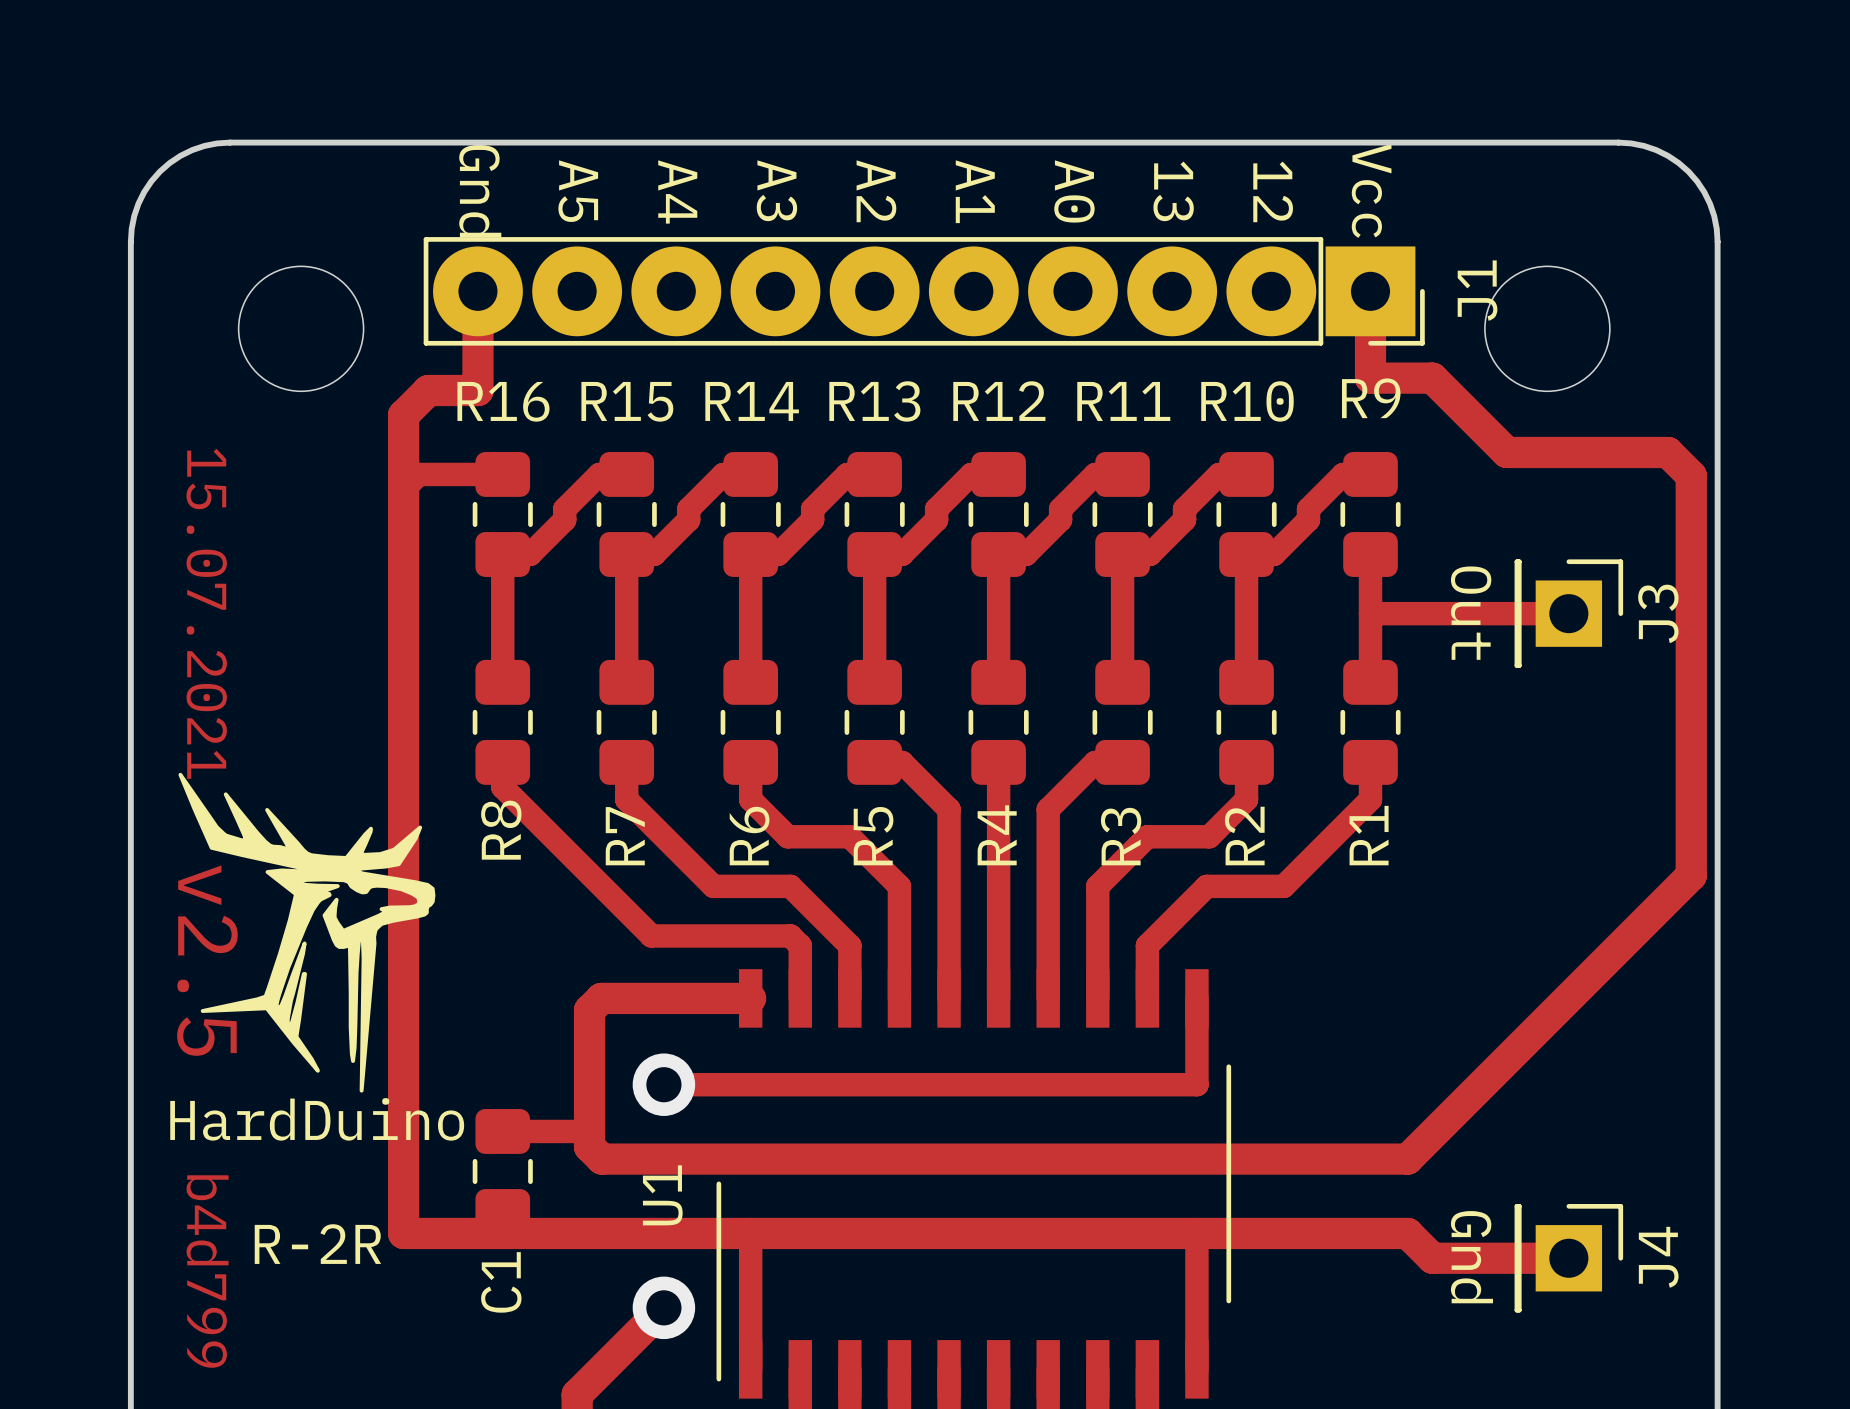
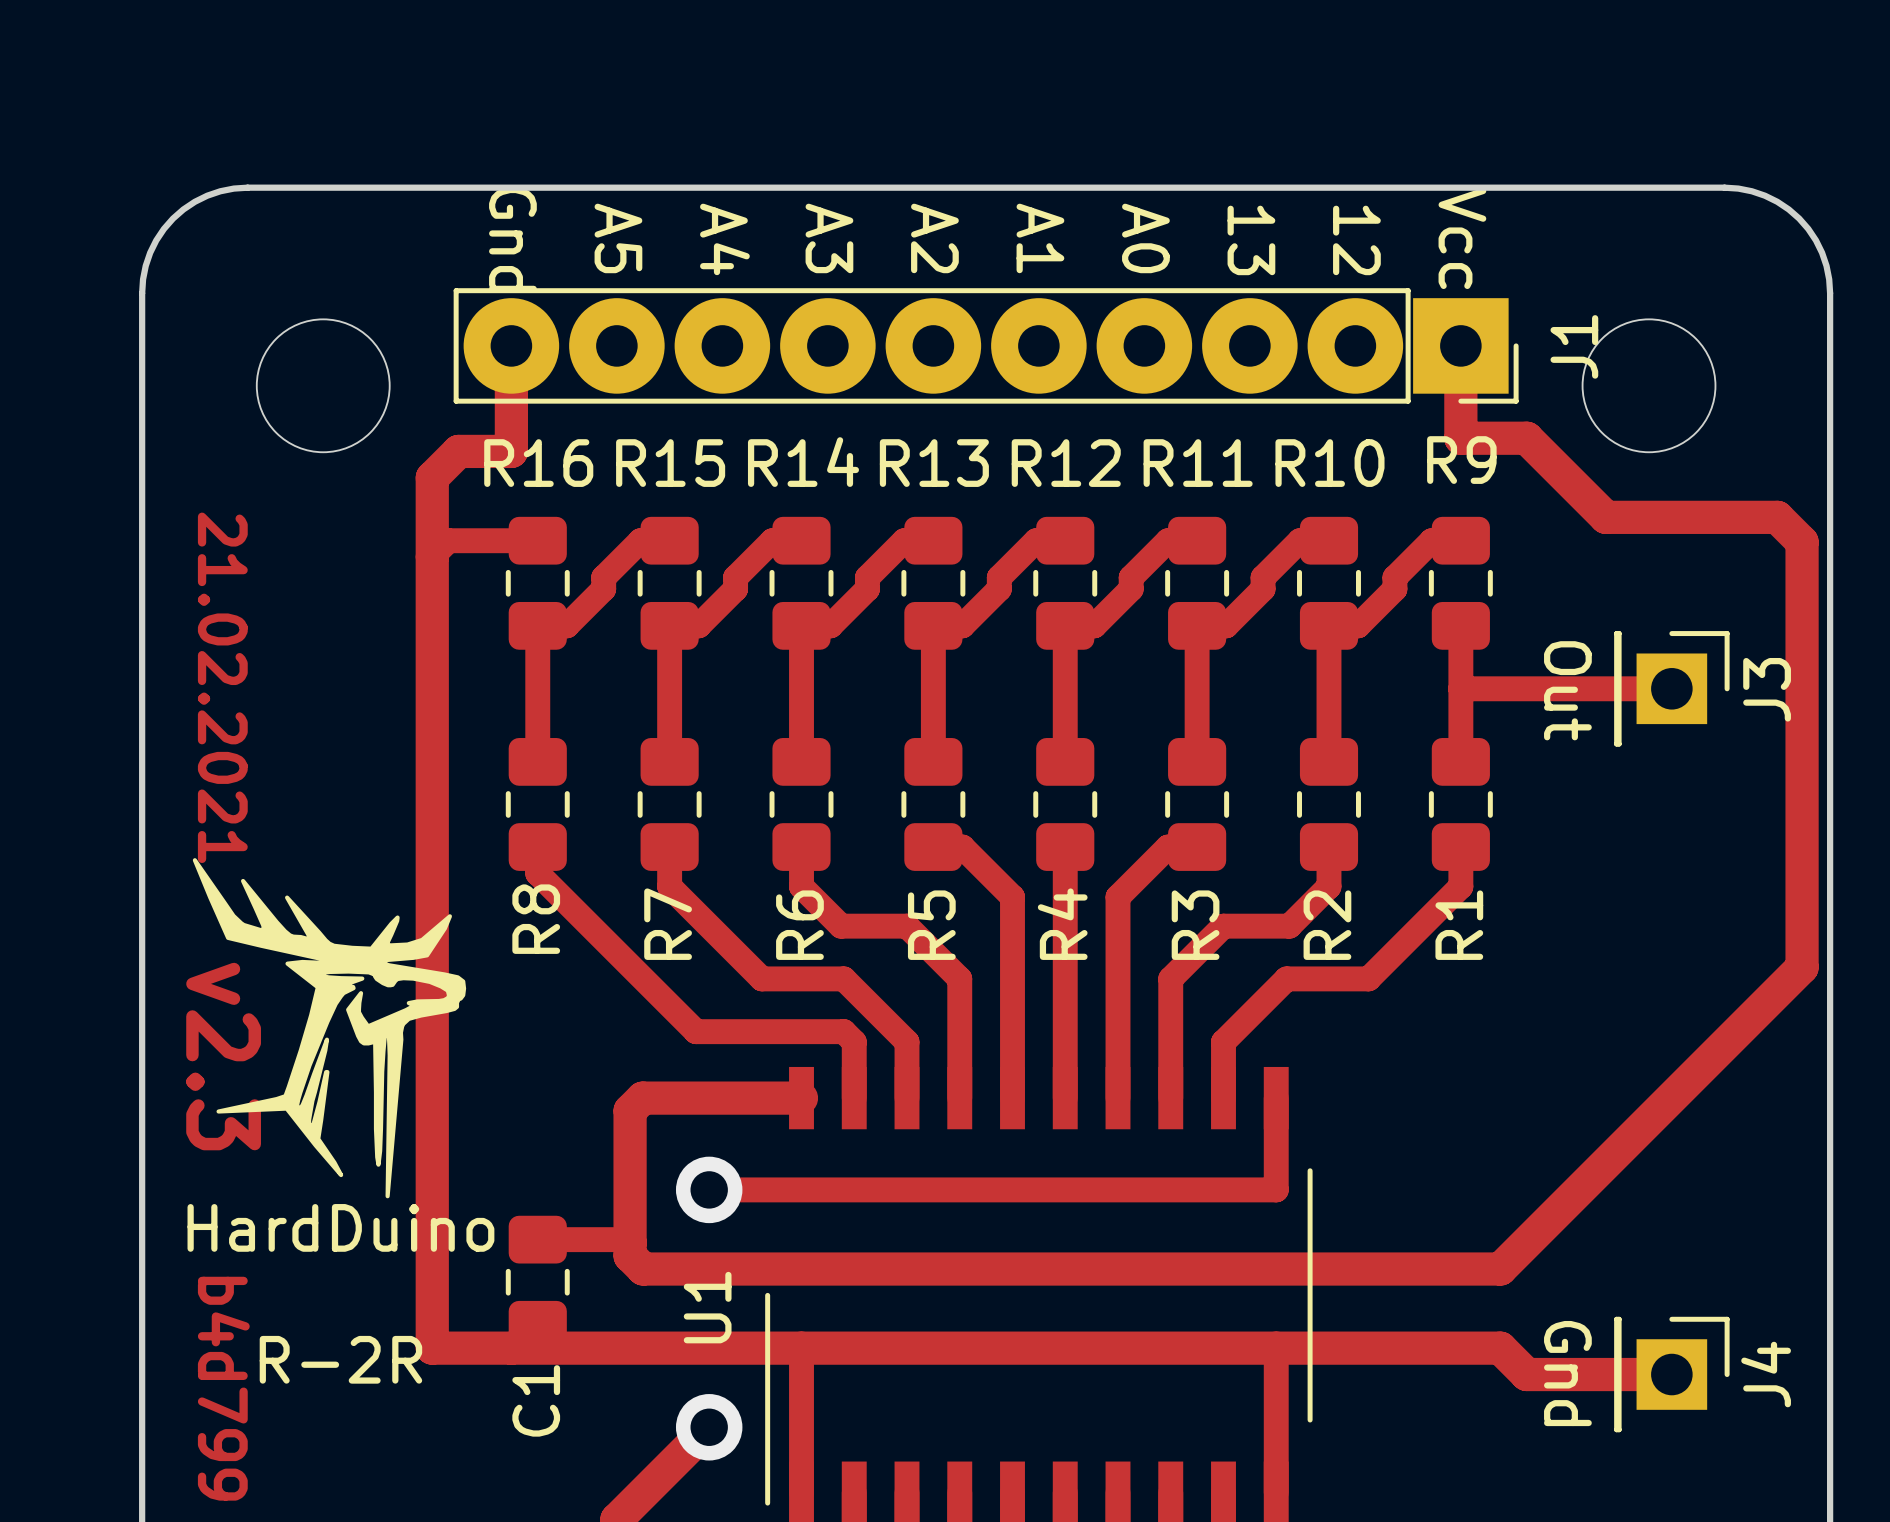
text: 15.07.2021 (206, 613) -> 21.02.2021 (222, 687)
text: v2.5 (207, 960) -> v2.3 (223, 1056)

